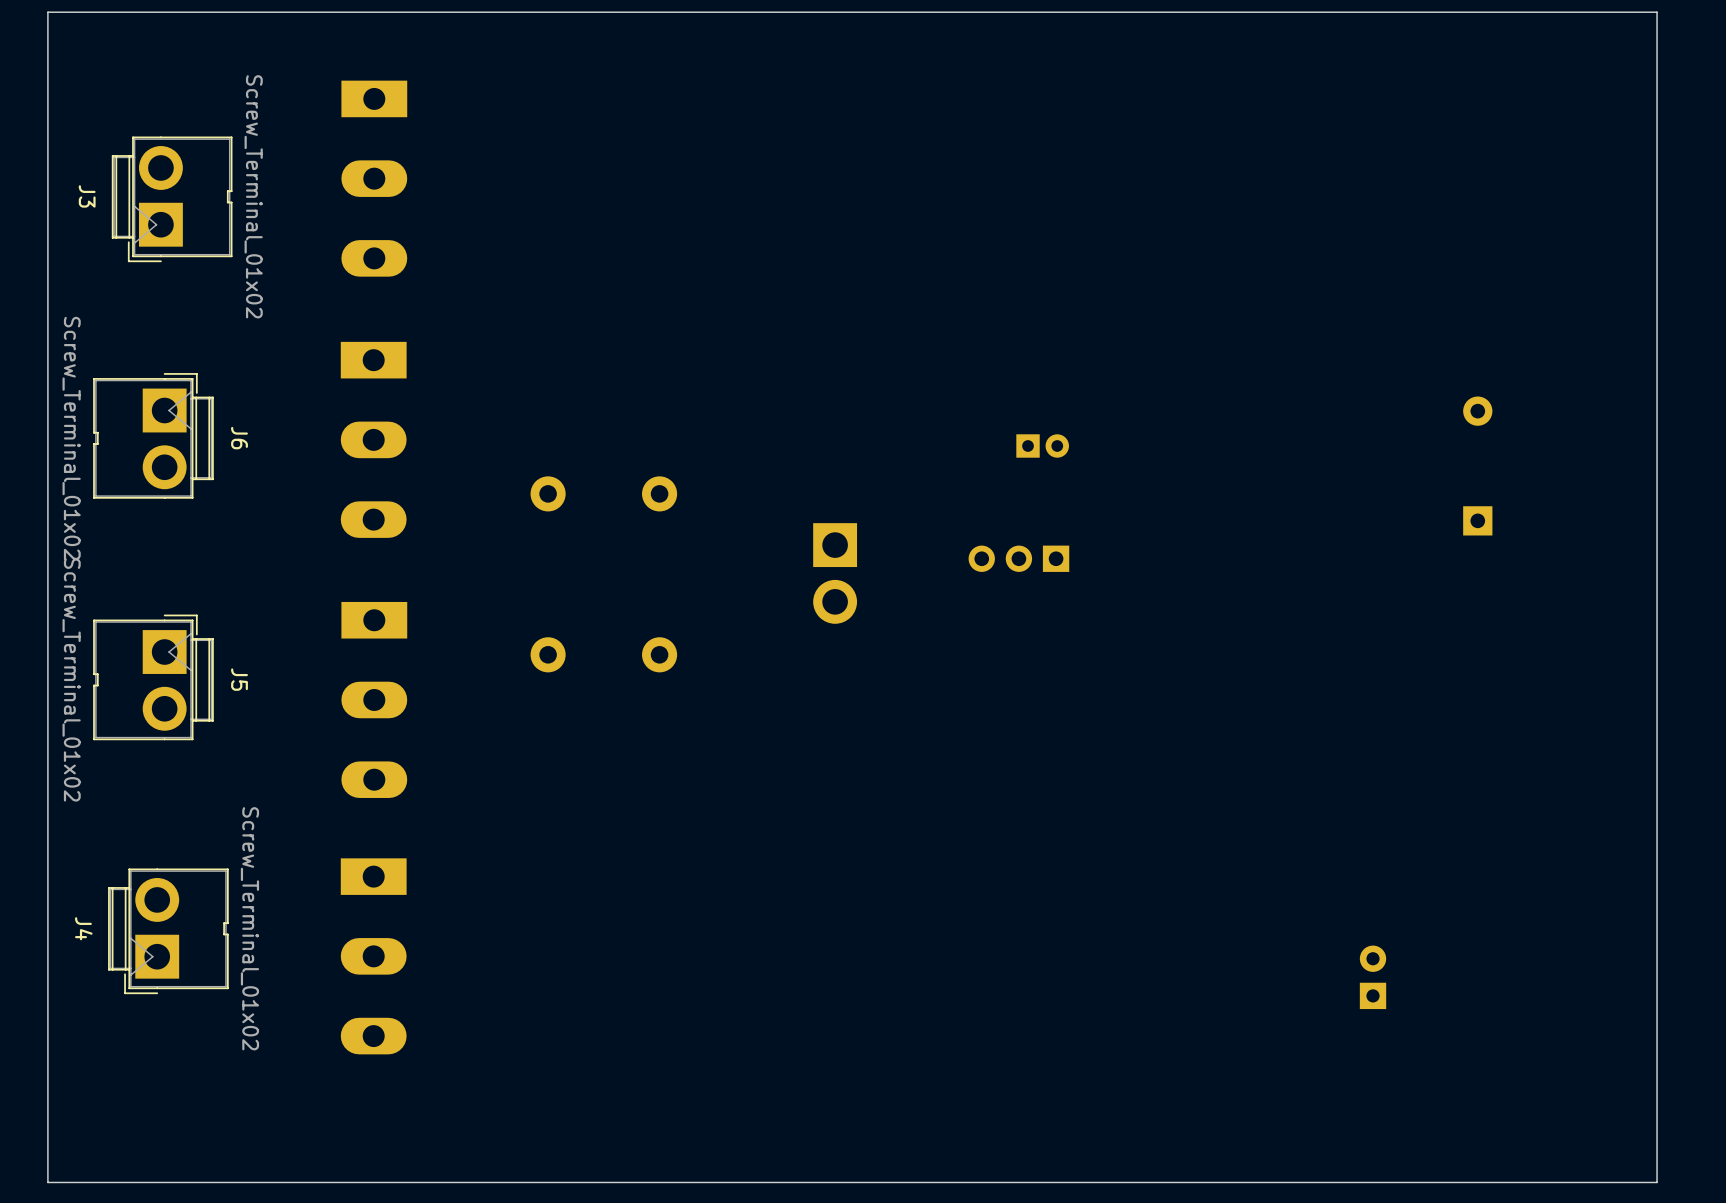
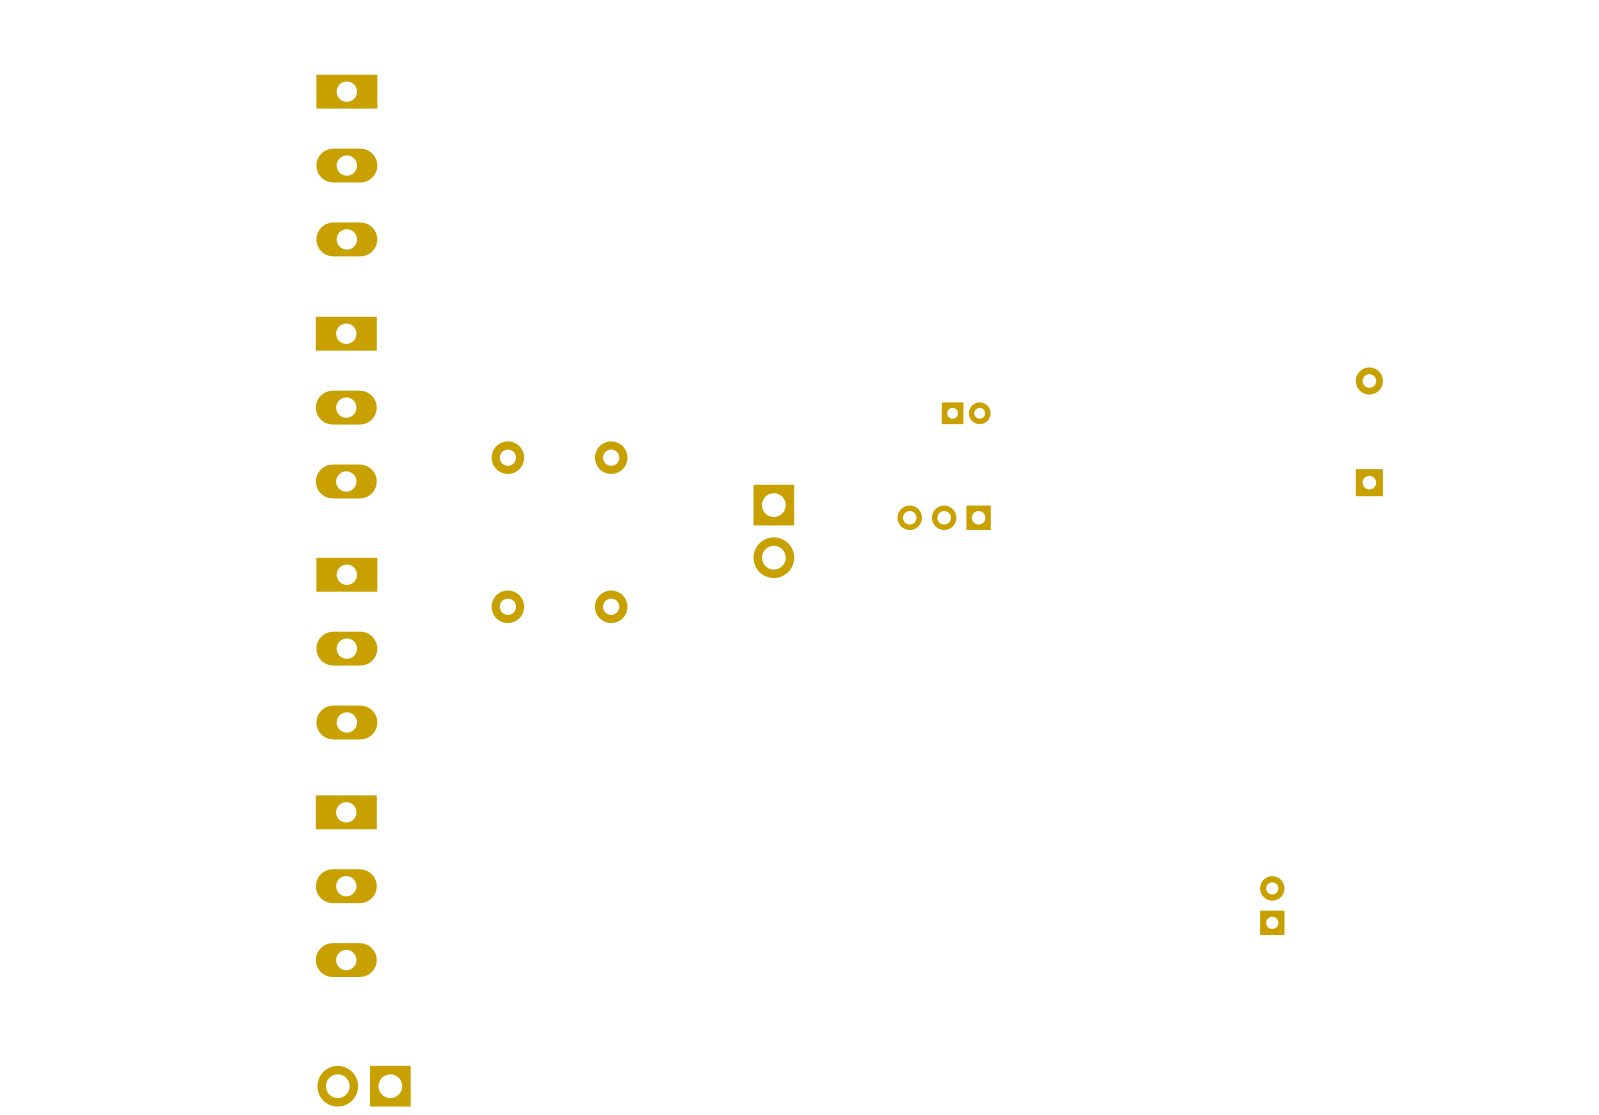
board edge: (1657, 12) (47, 12) (47, 1182) (1657, 1182) (1657, 12) -> none
J3: Screw_Terminal_01x02 (172, 199) -> none
J6: Screw_Terminal_01x02 (153, 435) -> none
J5: Screw_Terminal_01x02 (153, 677) -> none
J4: Screw_Terminal_01x02 (168, 931) -> none
part: none -> (364, 1086)

